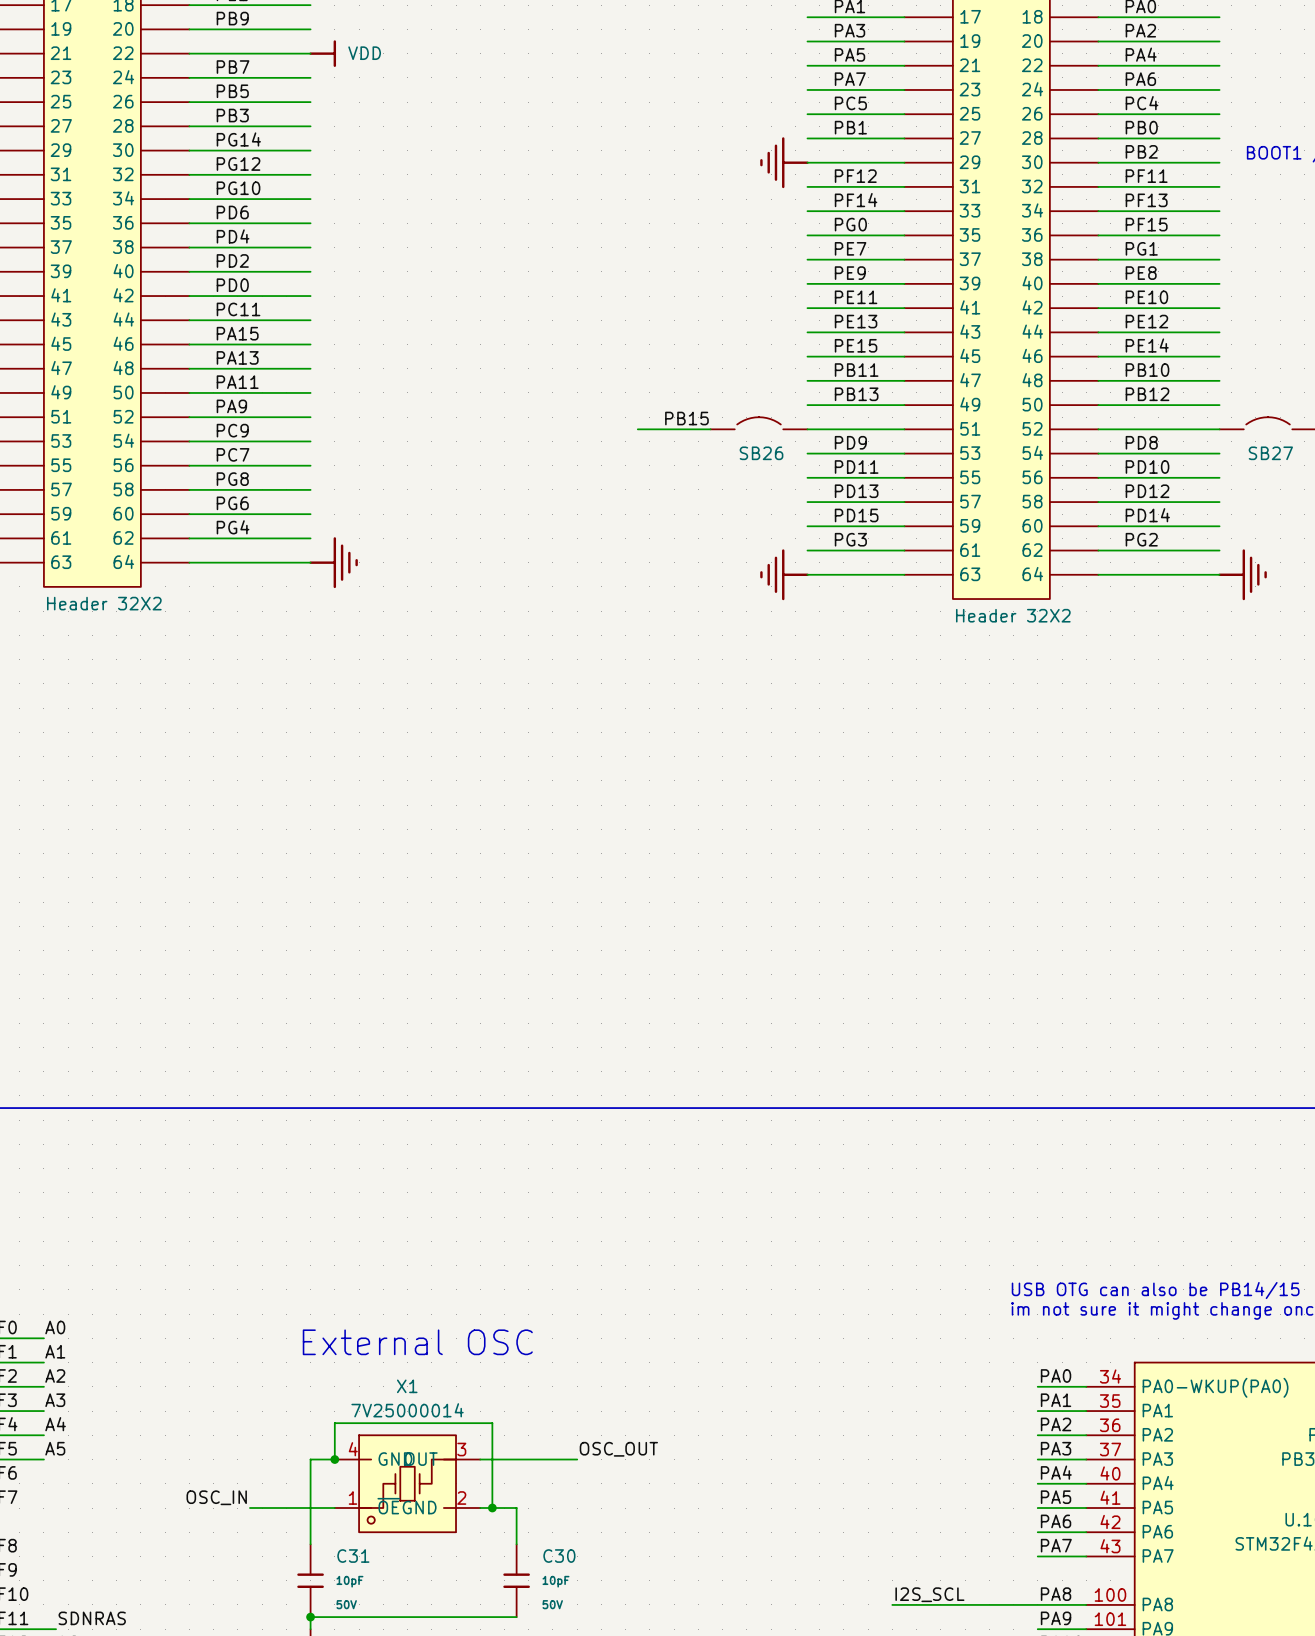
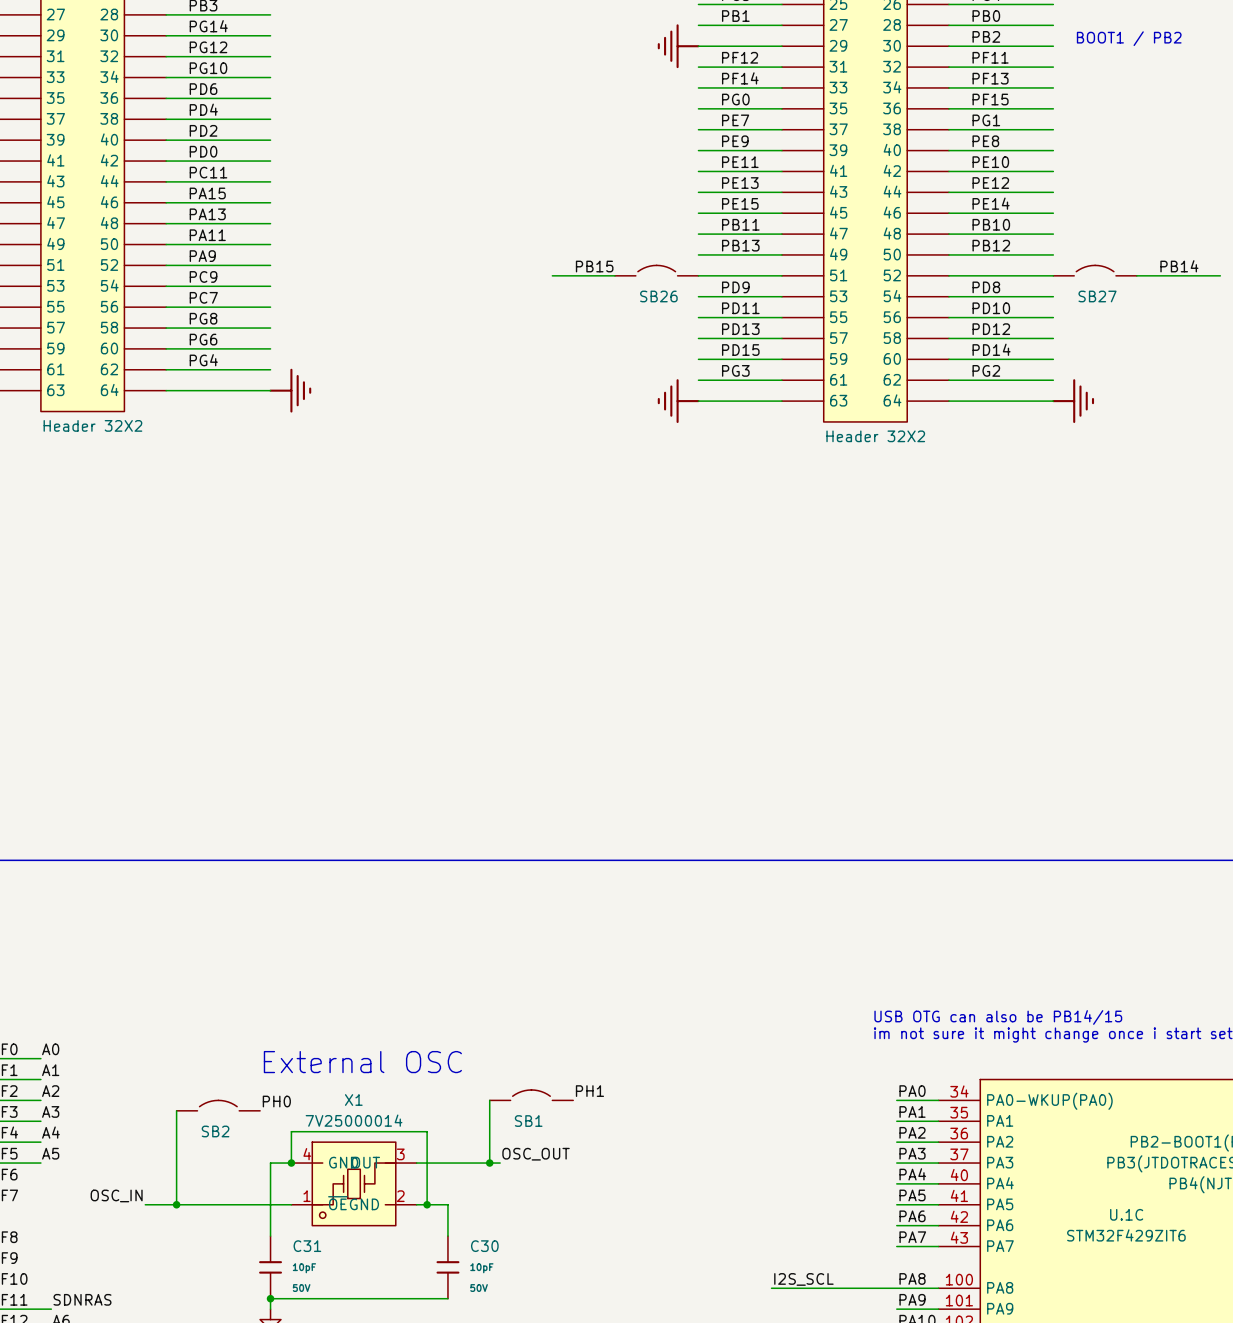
label: none -> PH1 (589, 1091)
SB1: none -> (531, 1095)
wire: none -> (489, 1100) (489, 1163)
label: none -> PH0 (276, 1101)
SB2: none -> (218, 1105)
wire: none -> (176, 1110) (176, 1204)
junction: none -> (489, 1163)
label position: OSC_IN (216, 1497) -> OSC_IN (116, 1195)
wire: none -> (145, 1204) (218, 1204)
junction: none -> (176, 1204)

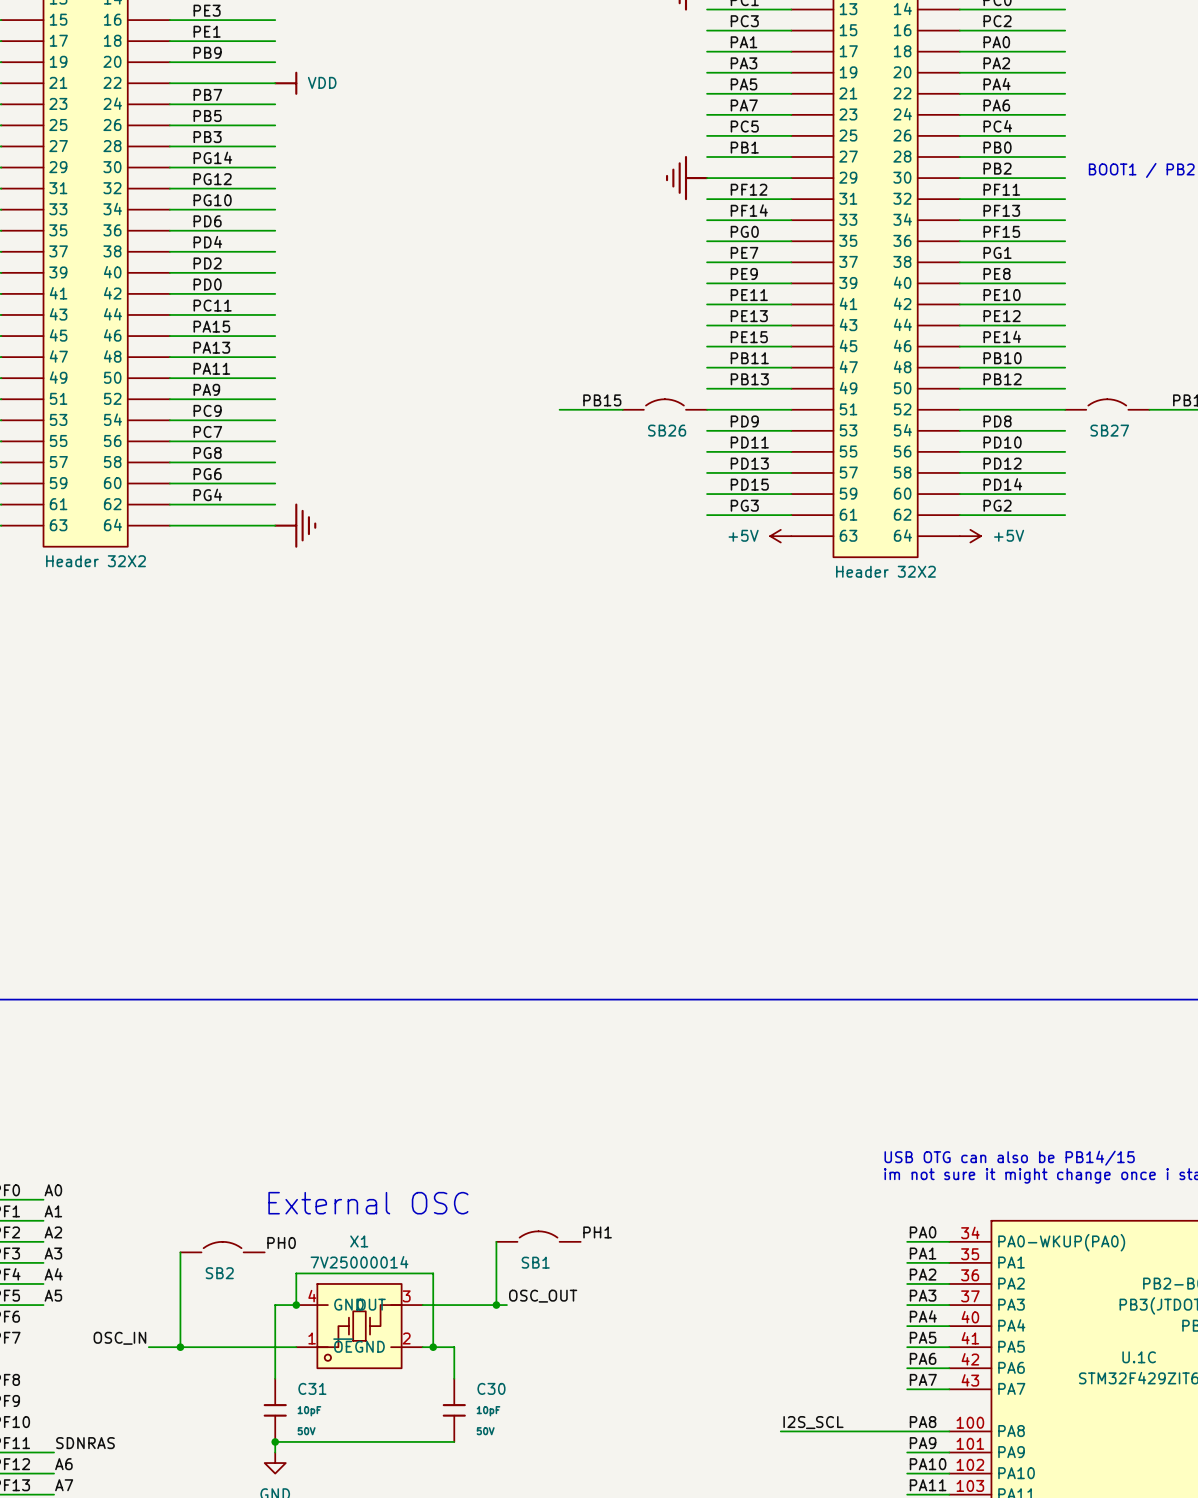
power symbol: (678, 401) -> none
wire: (698, 401) (781, 401) -> none
power symbol: none -> +5V (780, 536)
wire: (948, 401) (1053, 401) -> none
power symbol: none -> +5V (970, 536)
power symbol: (1073, 401) -> none

